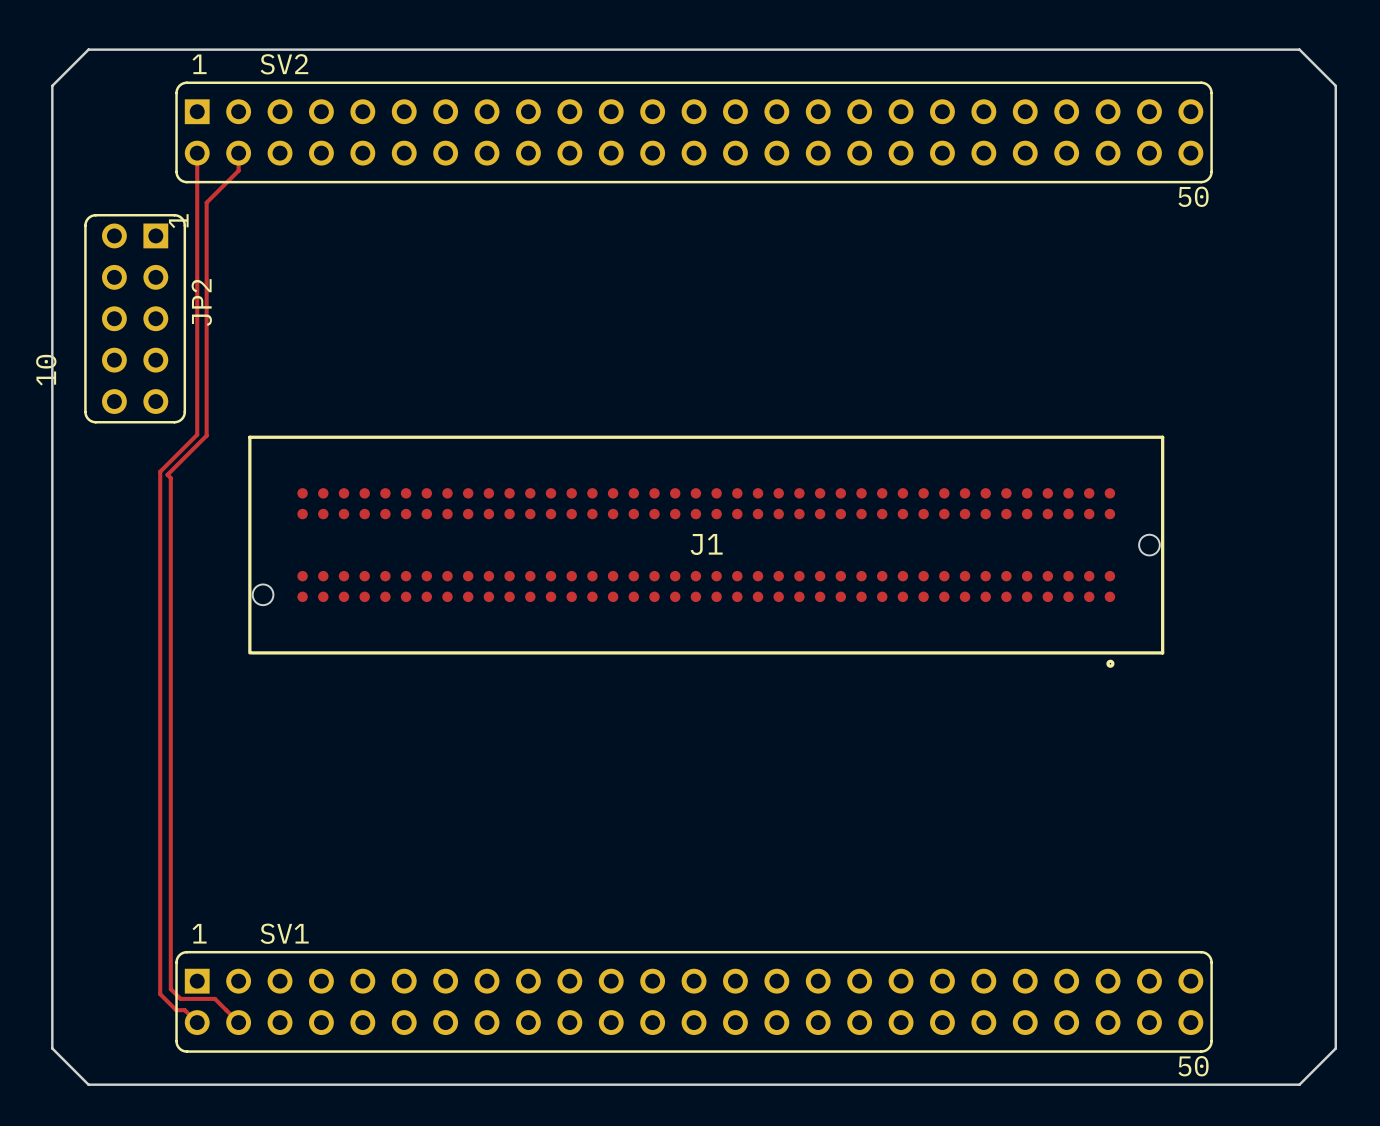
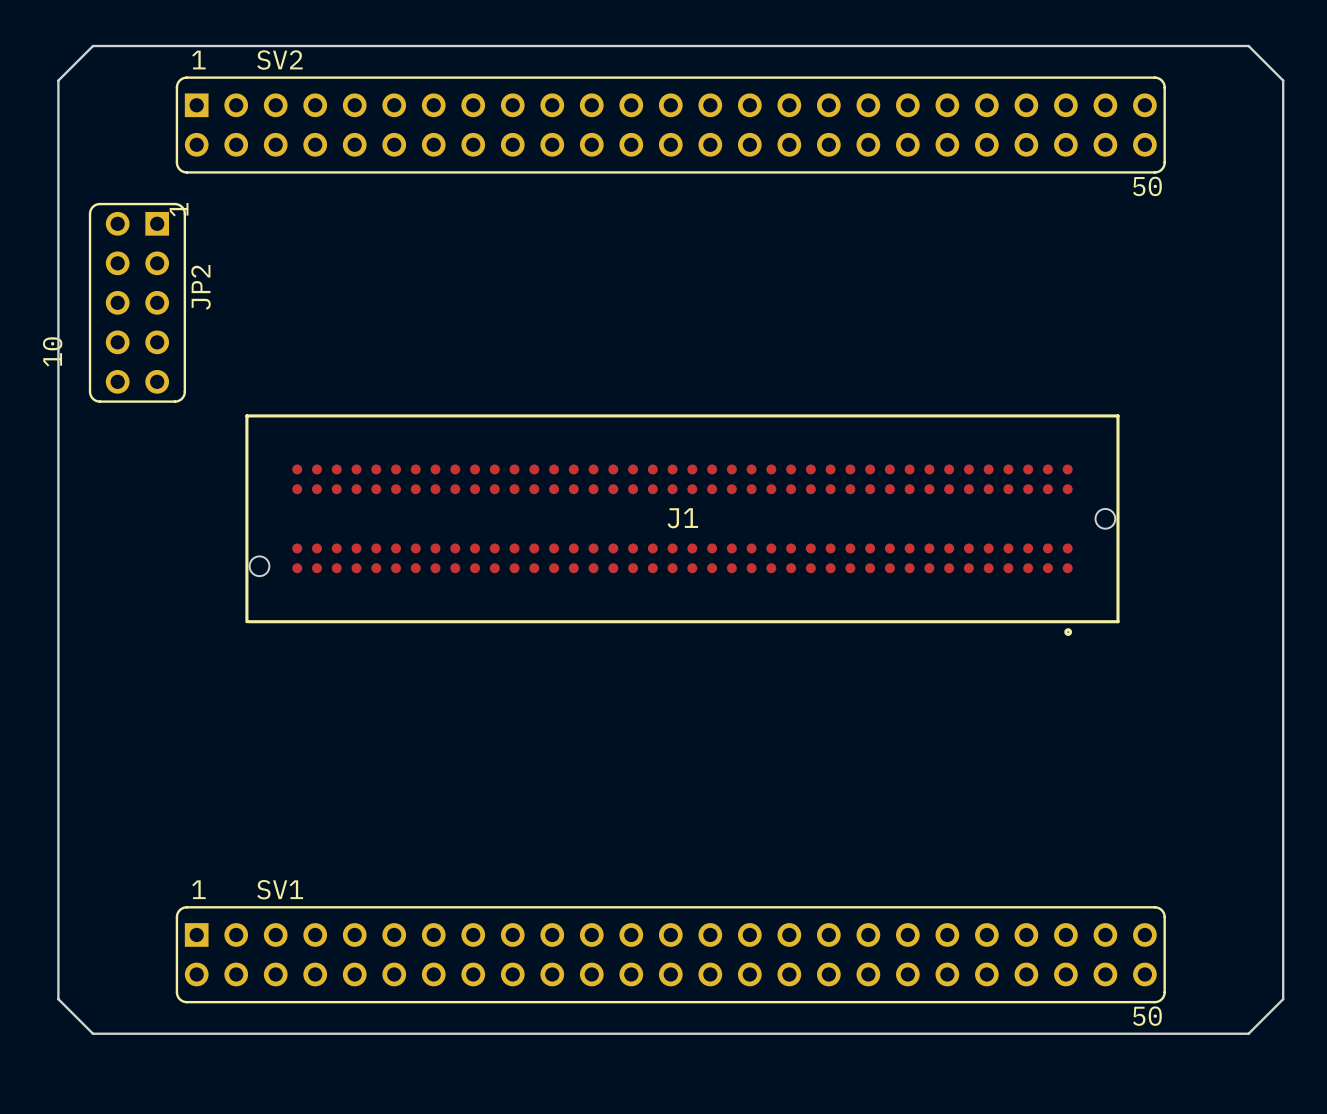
top track: (197, 153) (197, 434) (160, 471) (160, 994) (176, 1010) (184, 1010) (197, 1022) -> none
top track: (238, 153) (238, 170) (206, 202) (206, 435) (167, 474) (170, 478) (170, 989) (180, 998) (214, 998) (238, 1022) -> none

